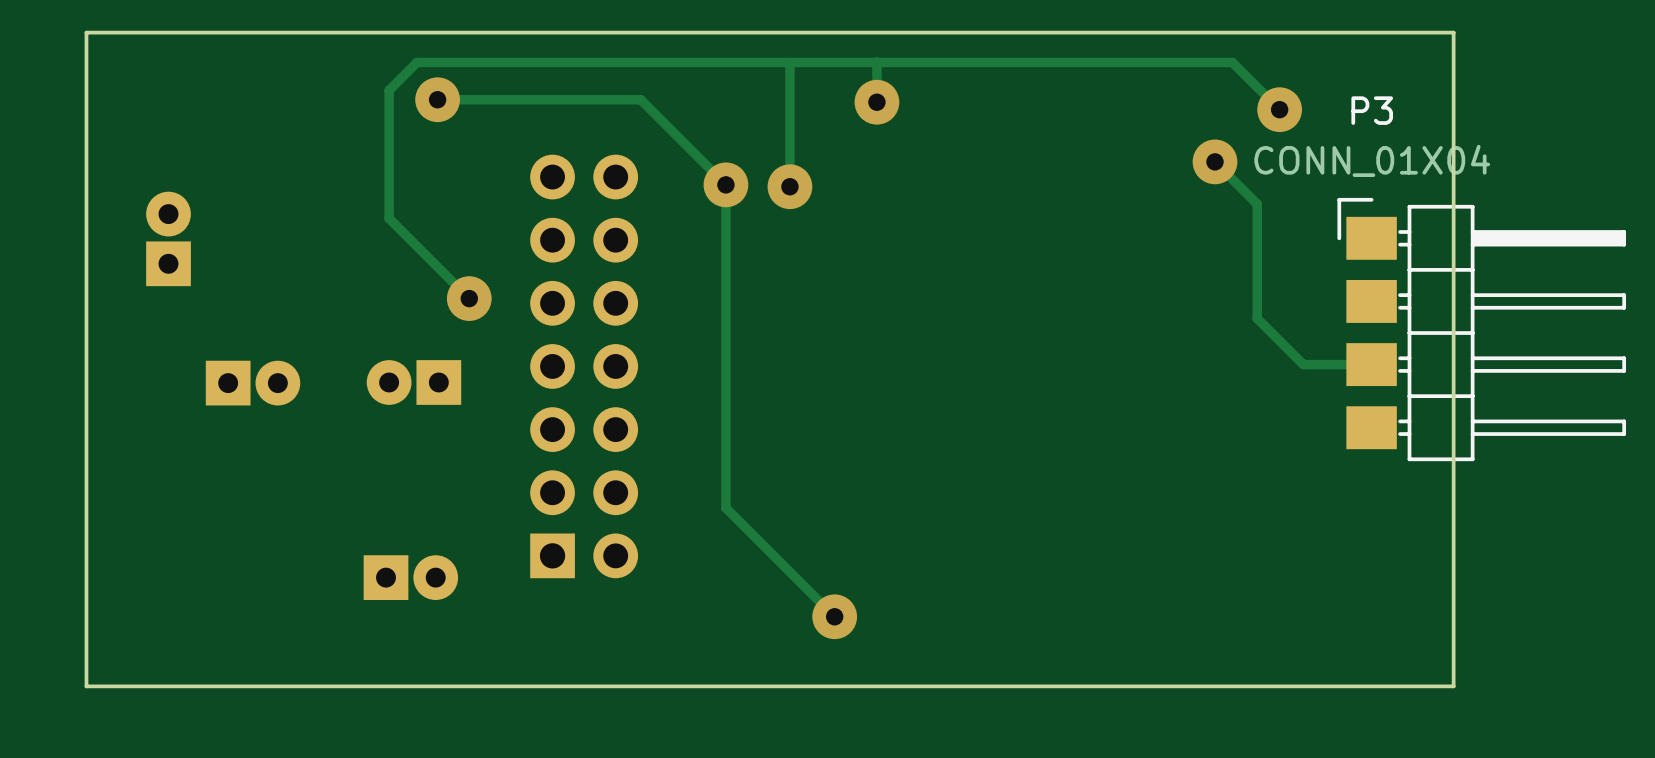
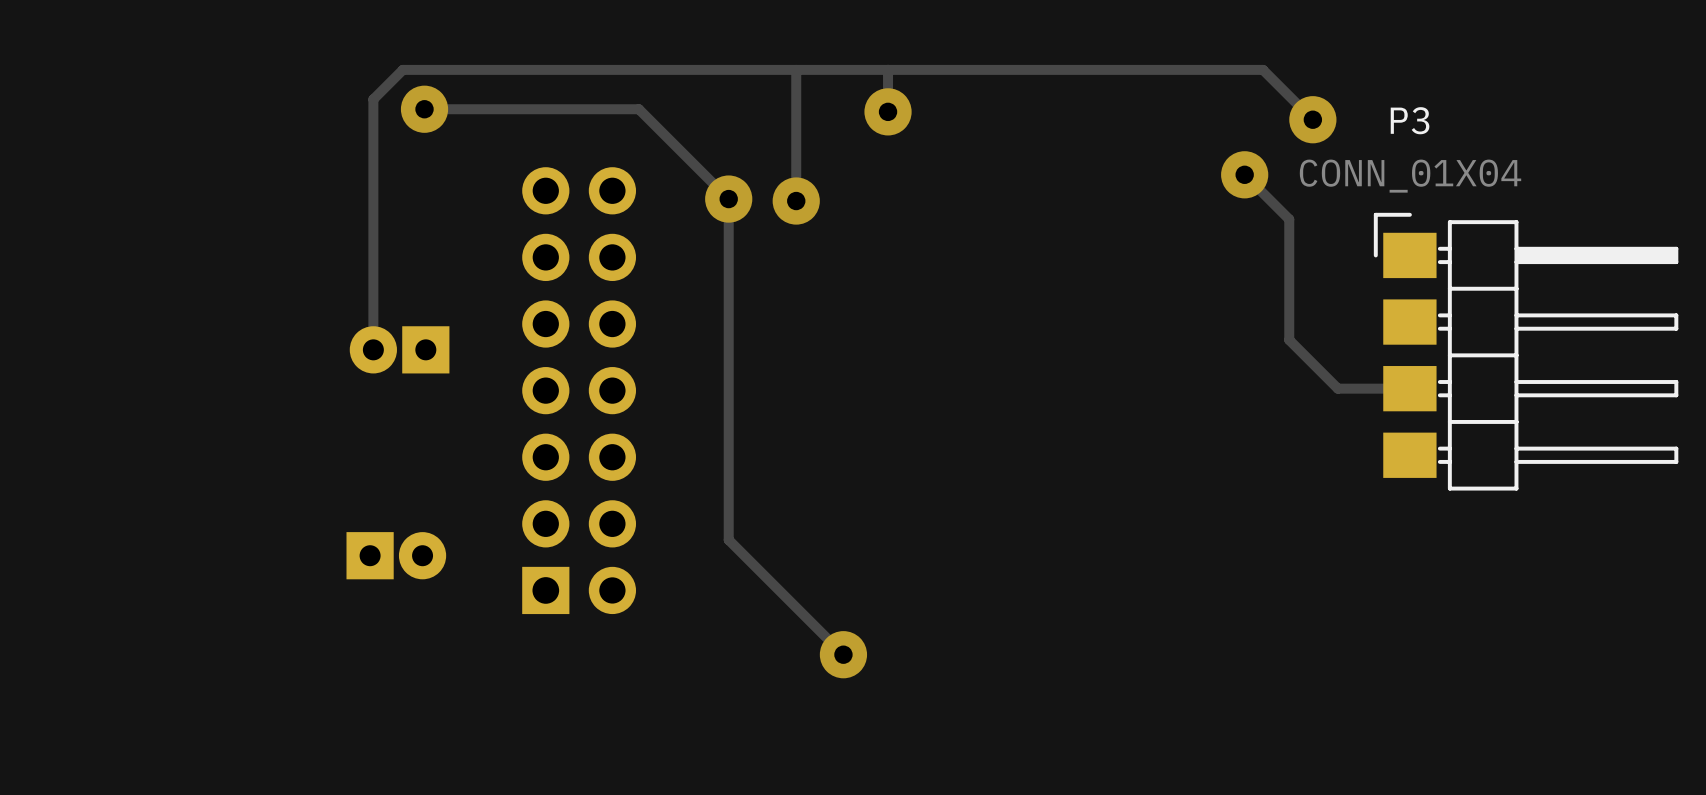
board edge: (1453, 32) (1453, 686) (86, 686) (86, 32) (1453, 32) -> none
track: (389, 218) (469, 298) -> (373, 234) (373, 349)
part: (168, 238) -> none
via: (469, 298) -> none
part position: (413, 382) -> (399, 349)
part: (253, 383) -> none
part position: (410, 577) -> (396, 555)

